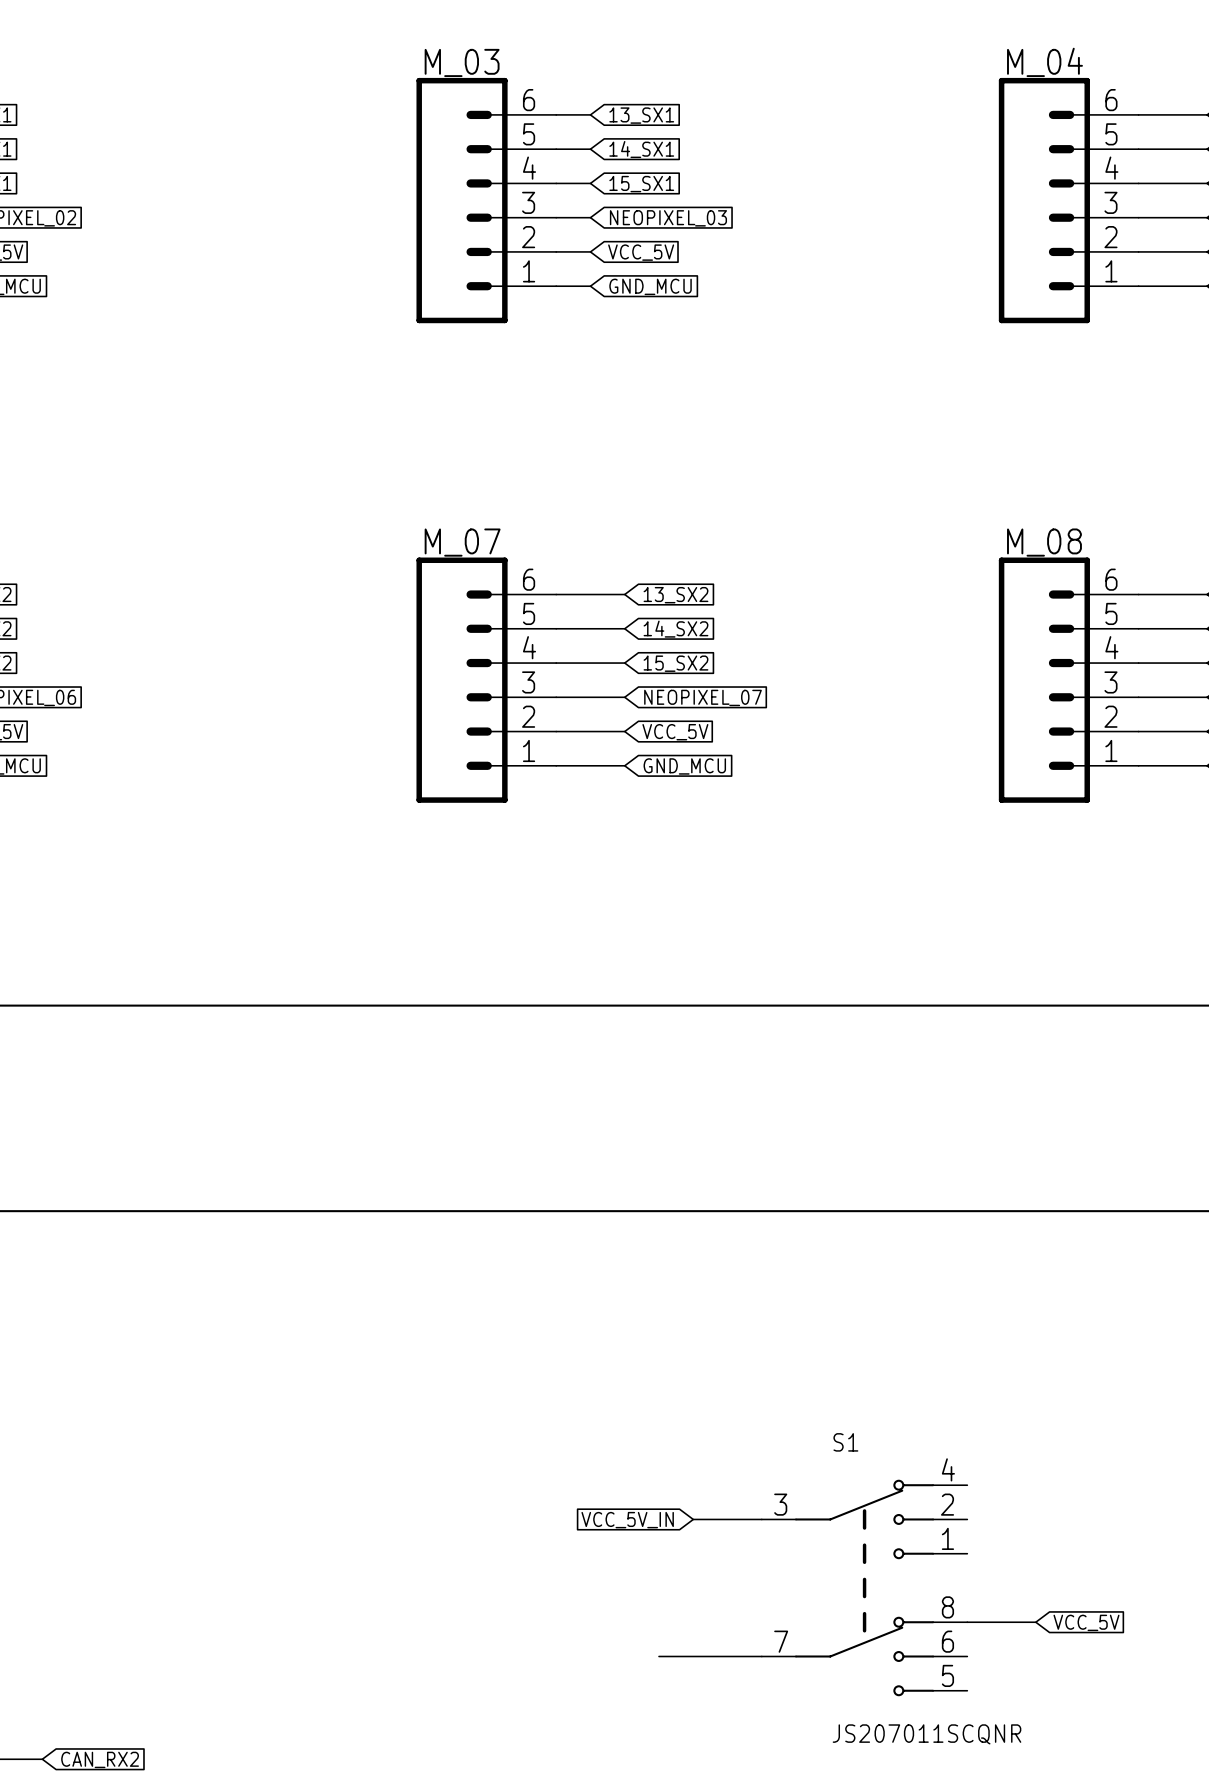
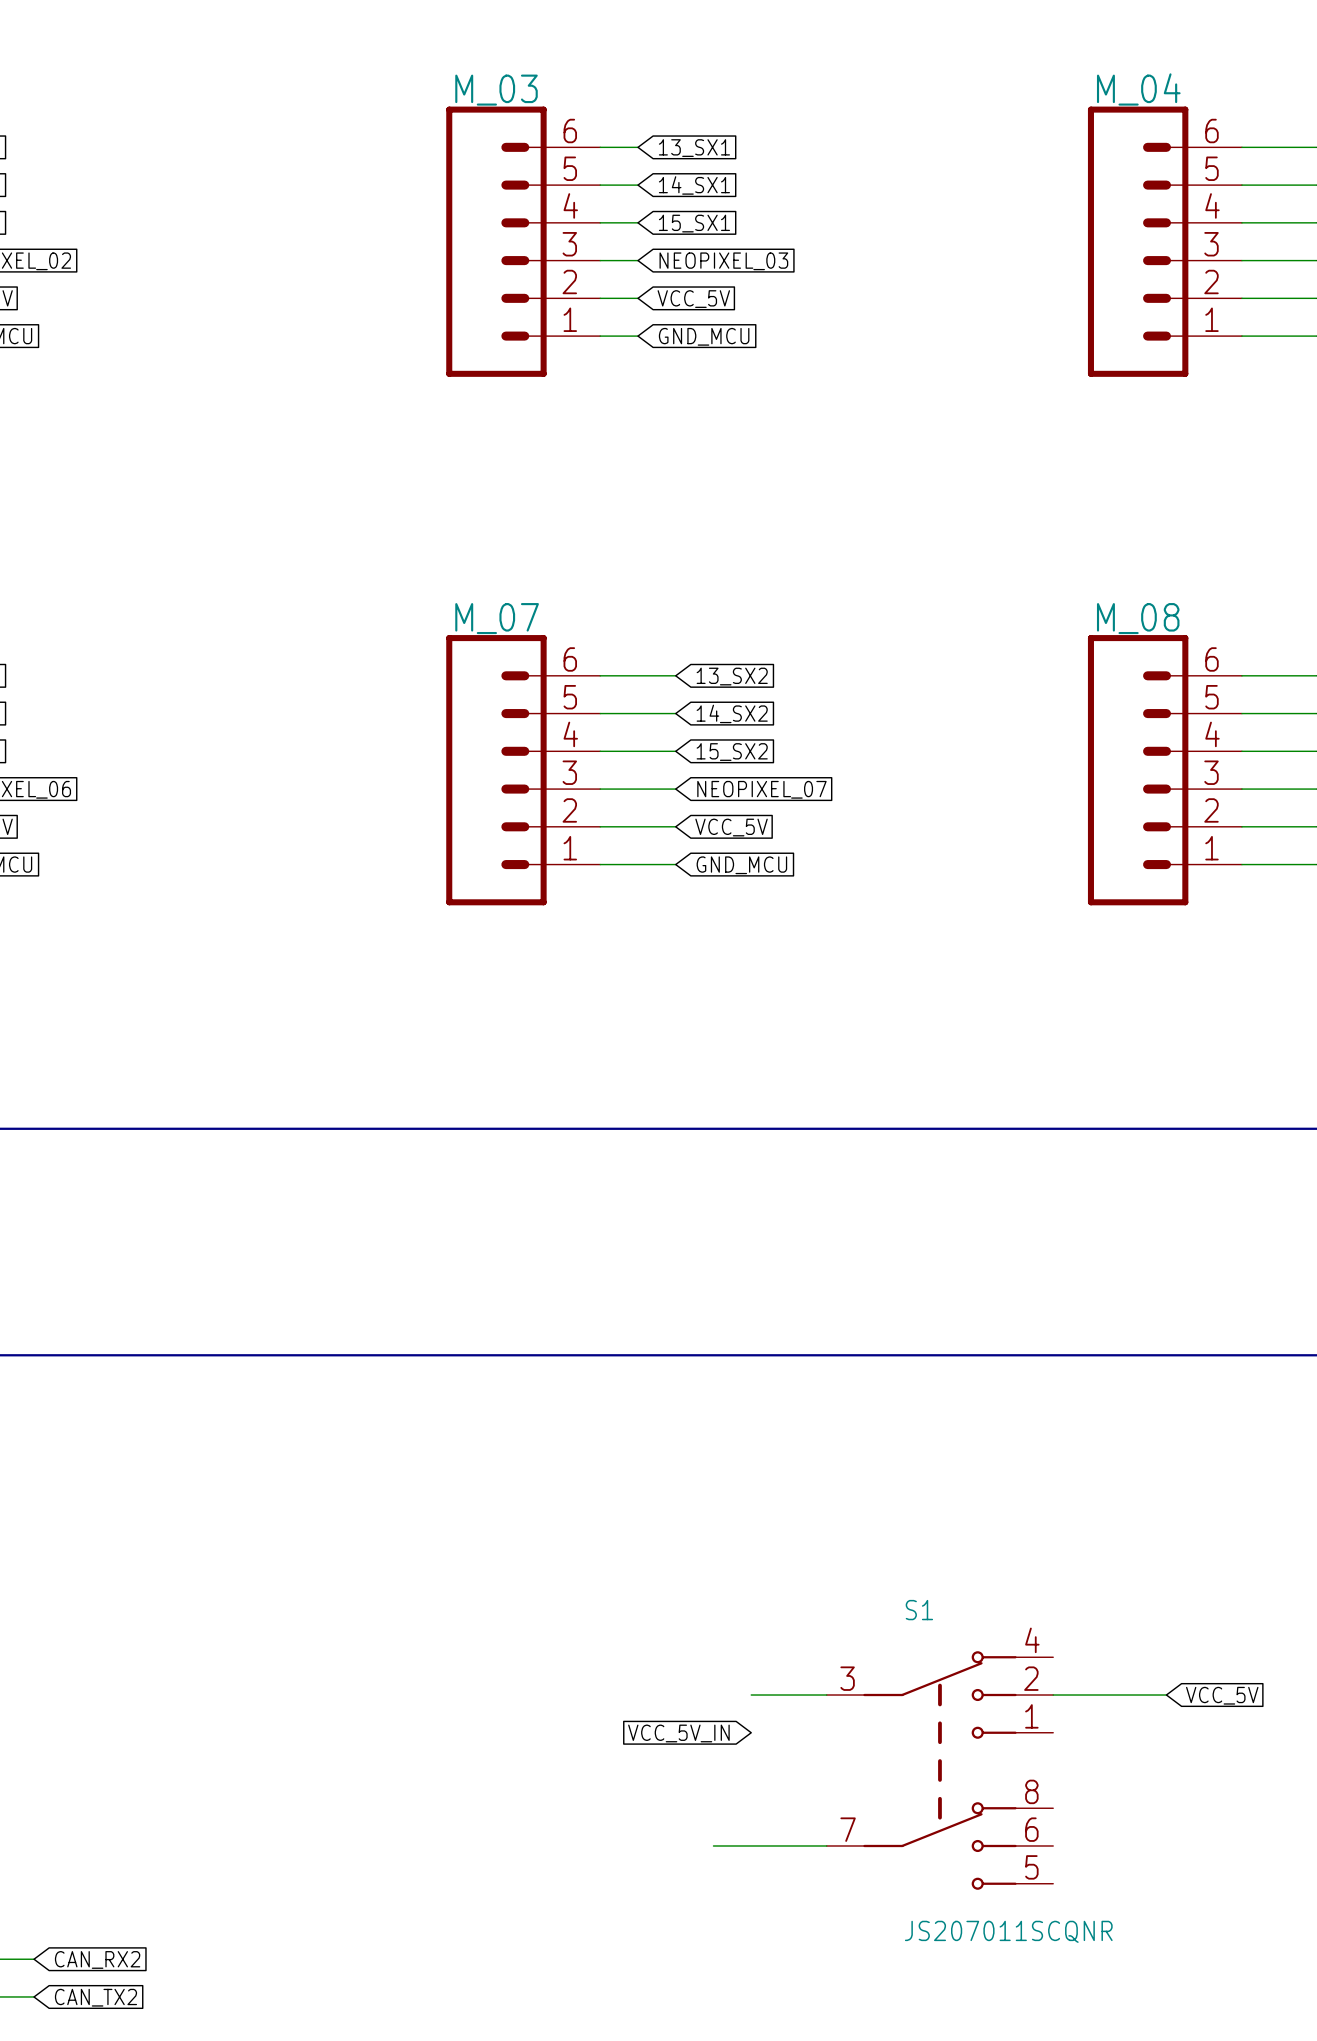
wire: none -> (1053, 1695) (1166, 1695)
global label position: VCC_5V_IN (627, 1520) -> VCC_5V_IN (678, 1733)
wire: (967, 1622) (1035, 1622) -> none
global label position: VCC_5V (1086, 1622) -> VCC_5V (1222, 1695)

